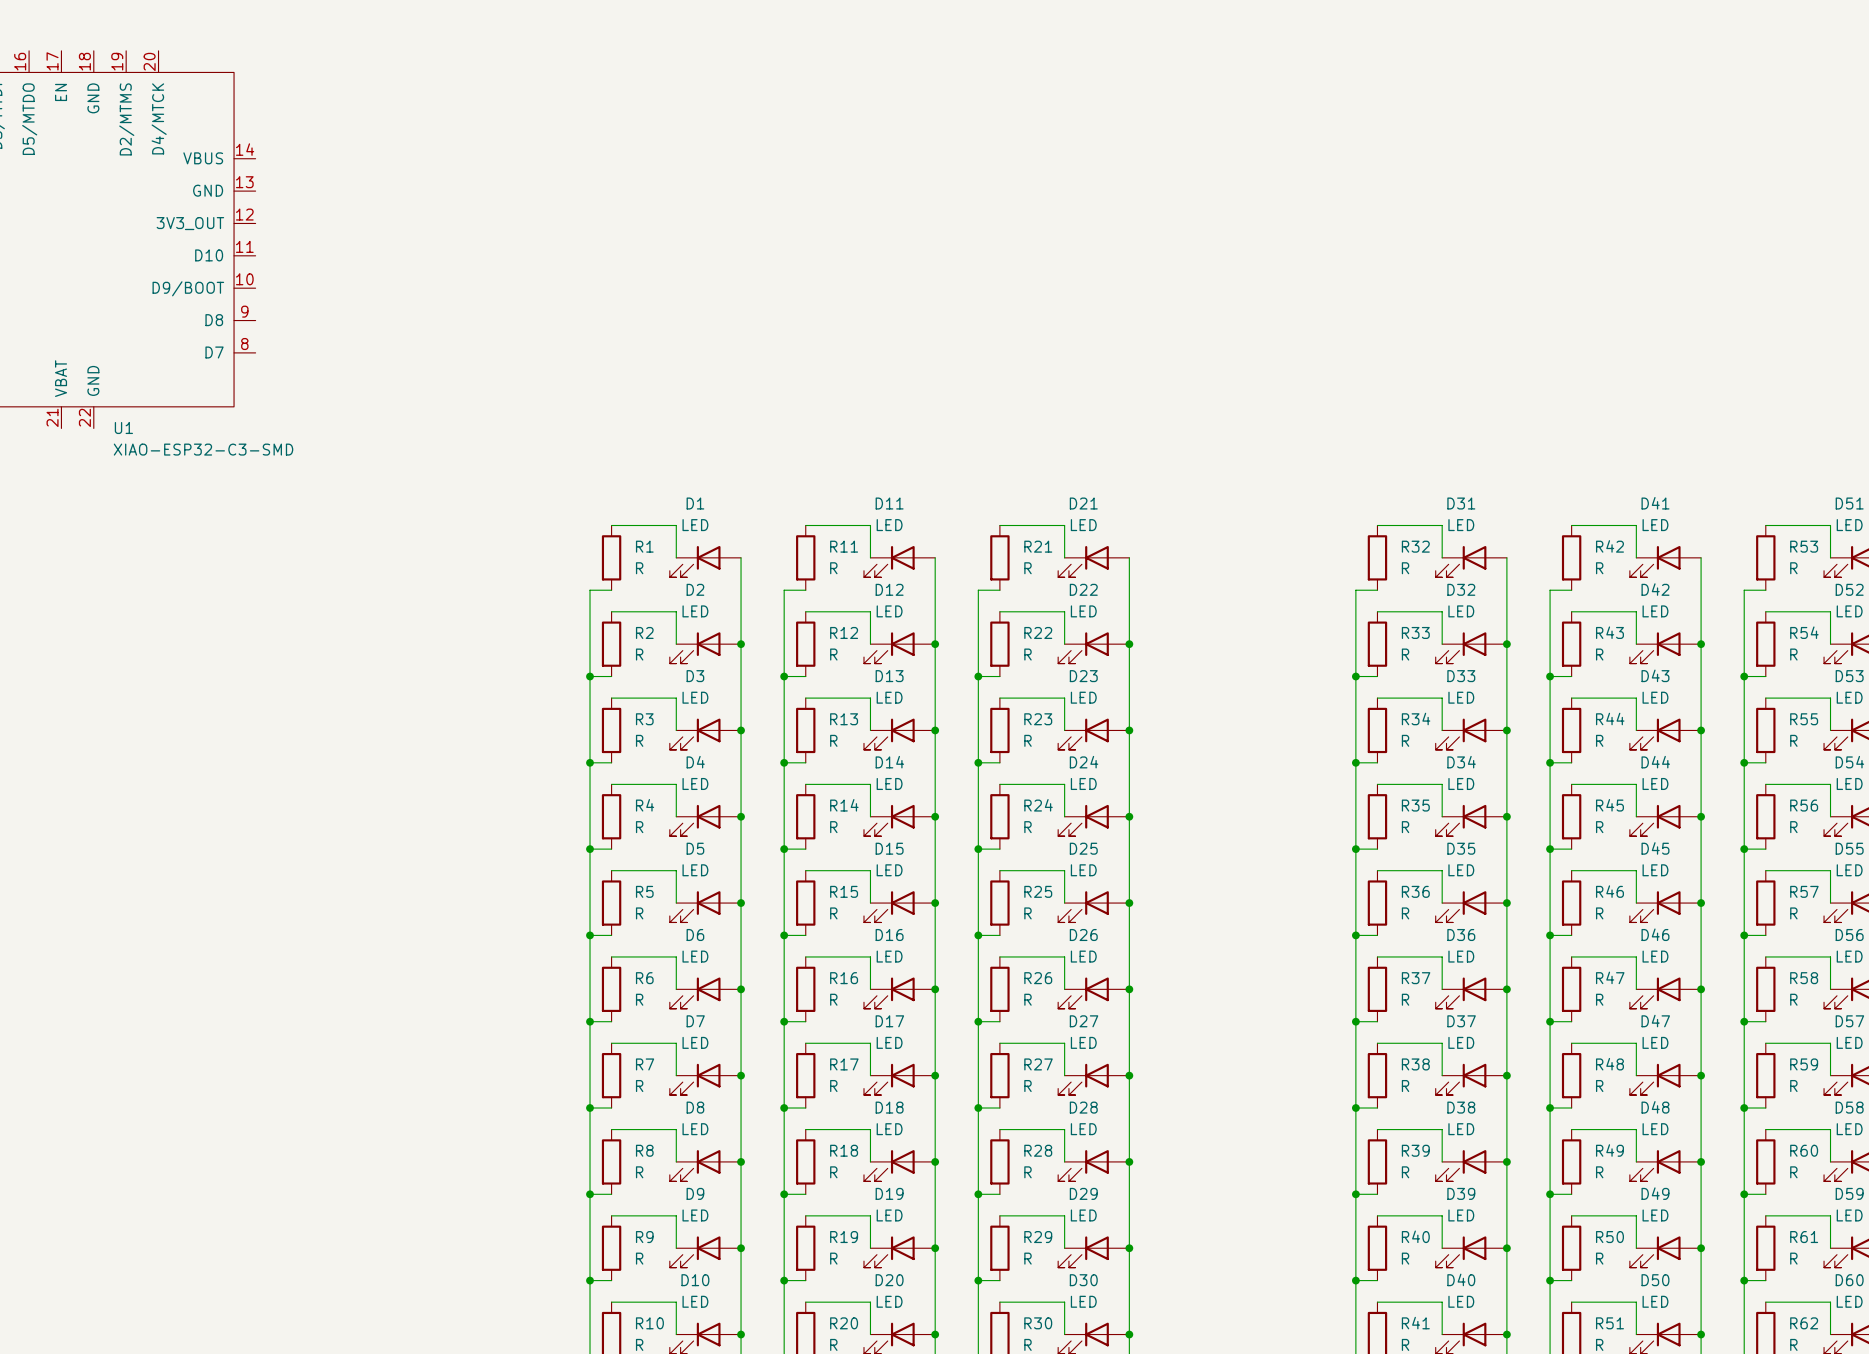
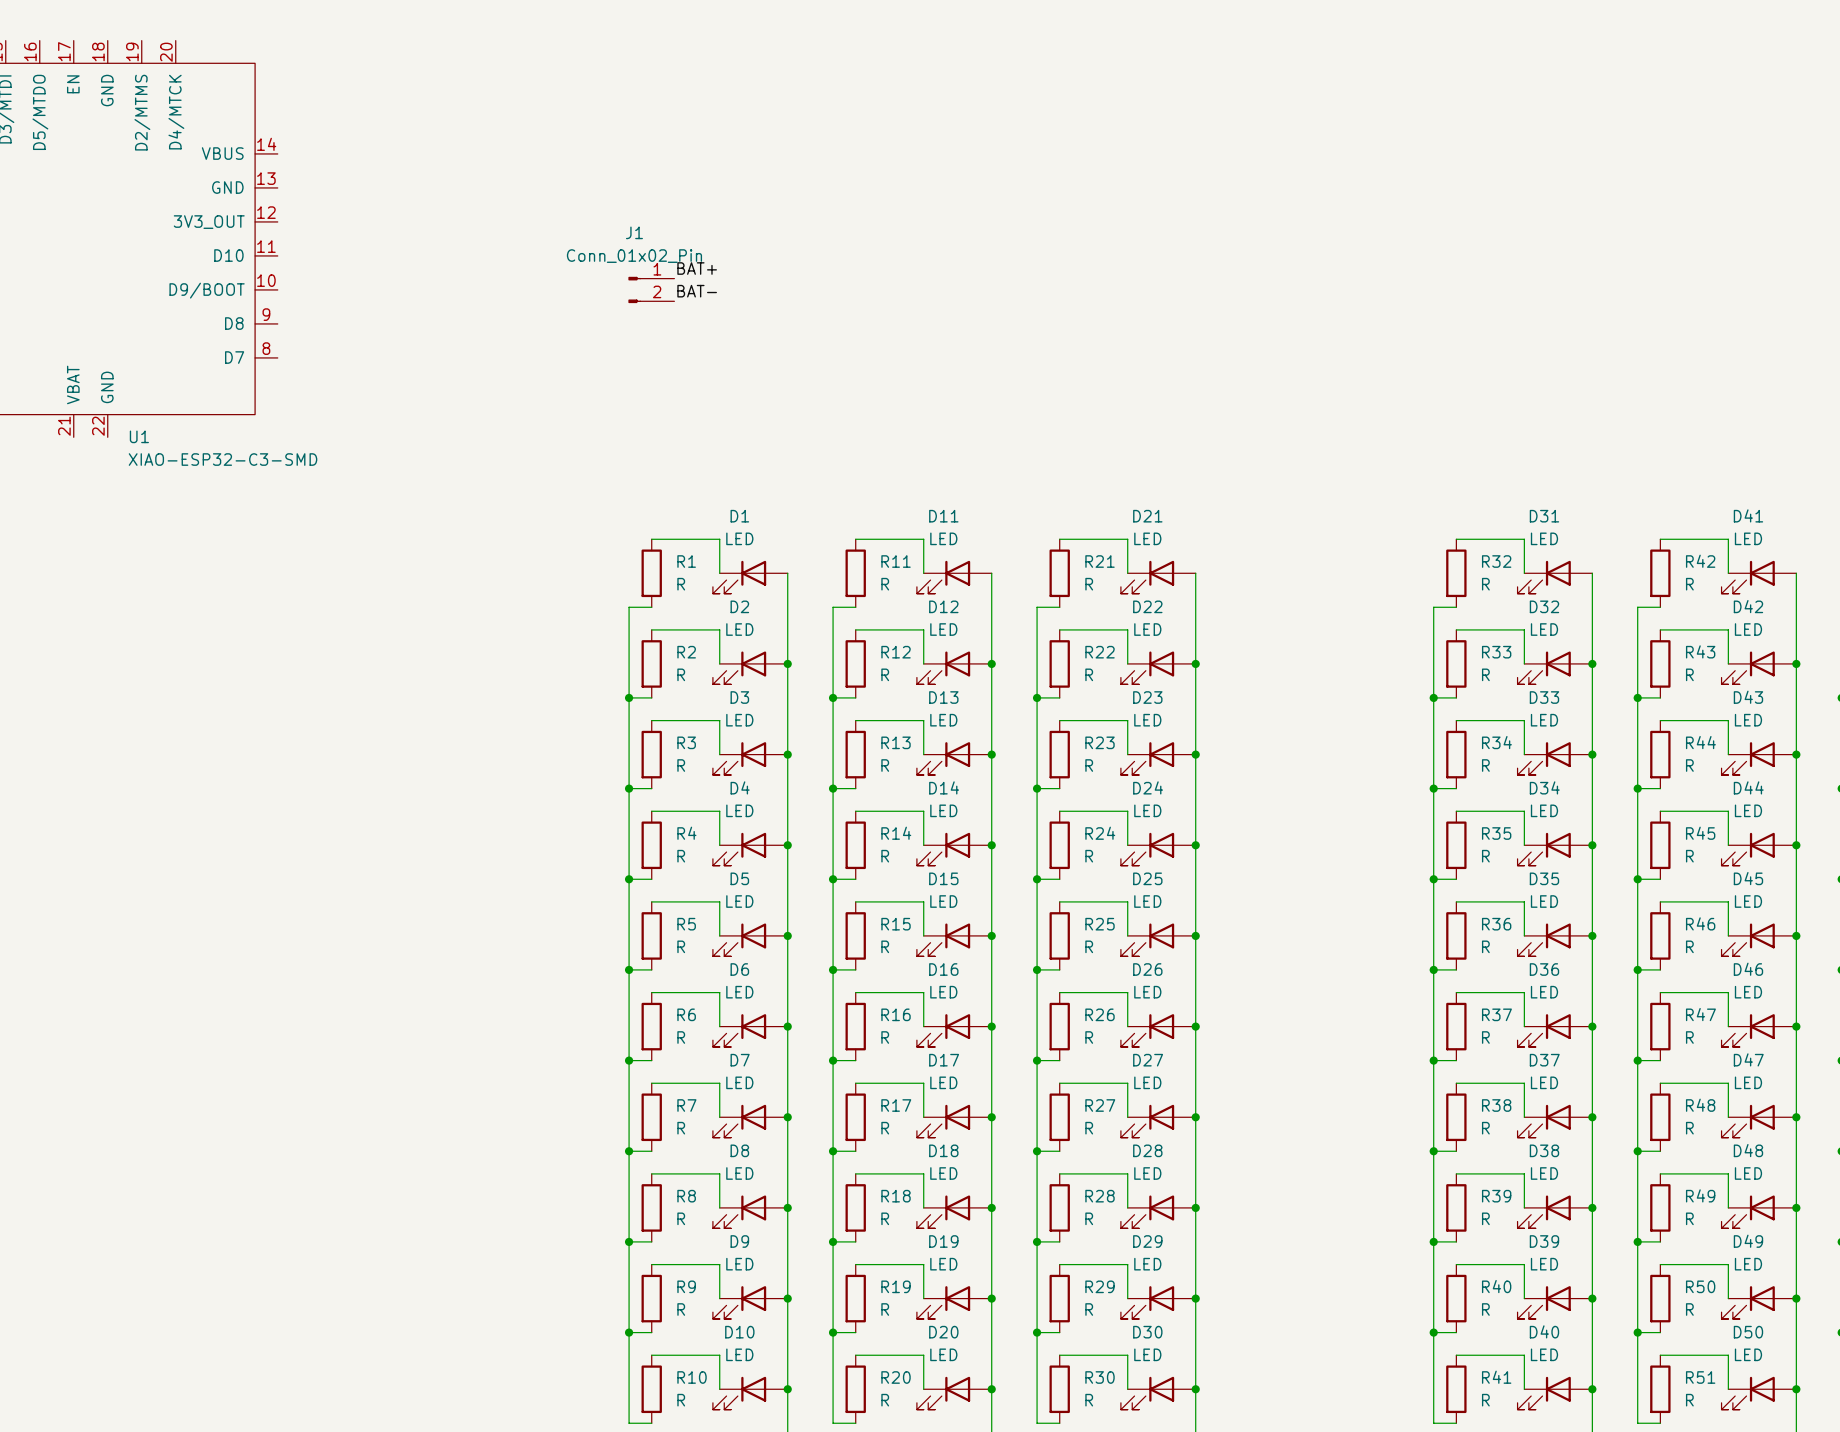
label: none -> BAT+ (697, 268)
J1: none -> Conn_01x02_Pin (651, 289)
label: none -> BAT- (697, 291)

